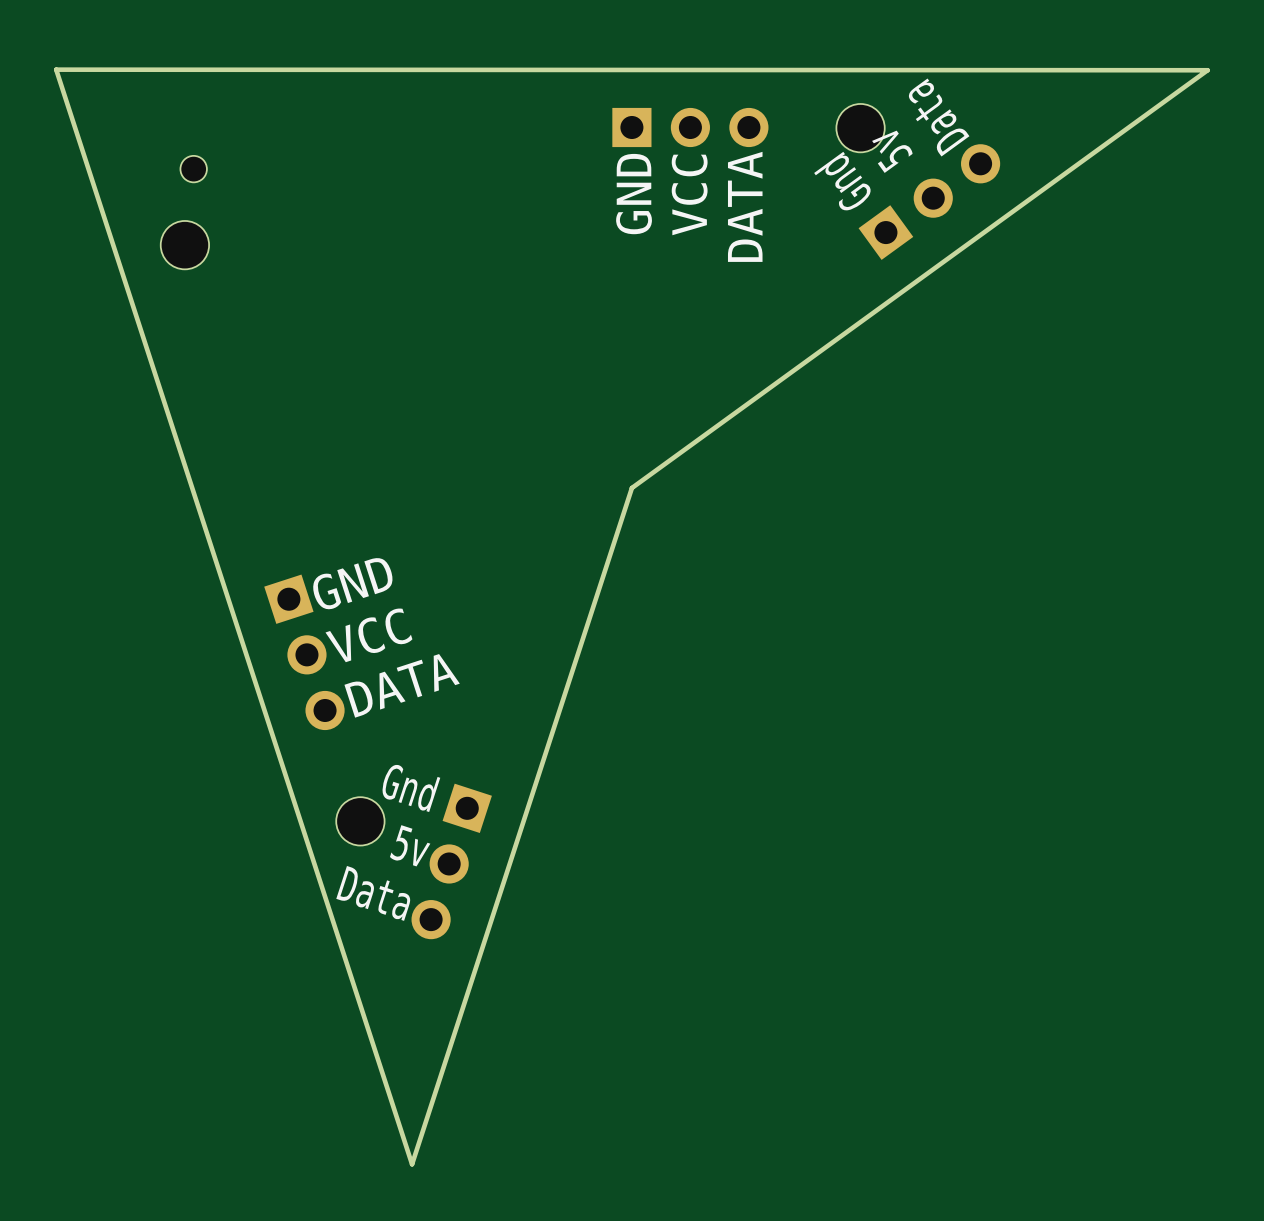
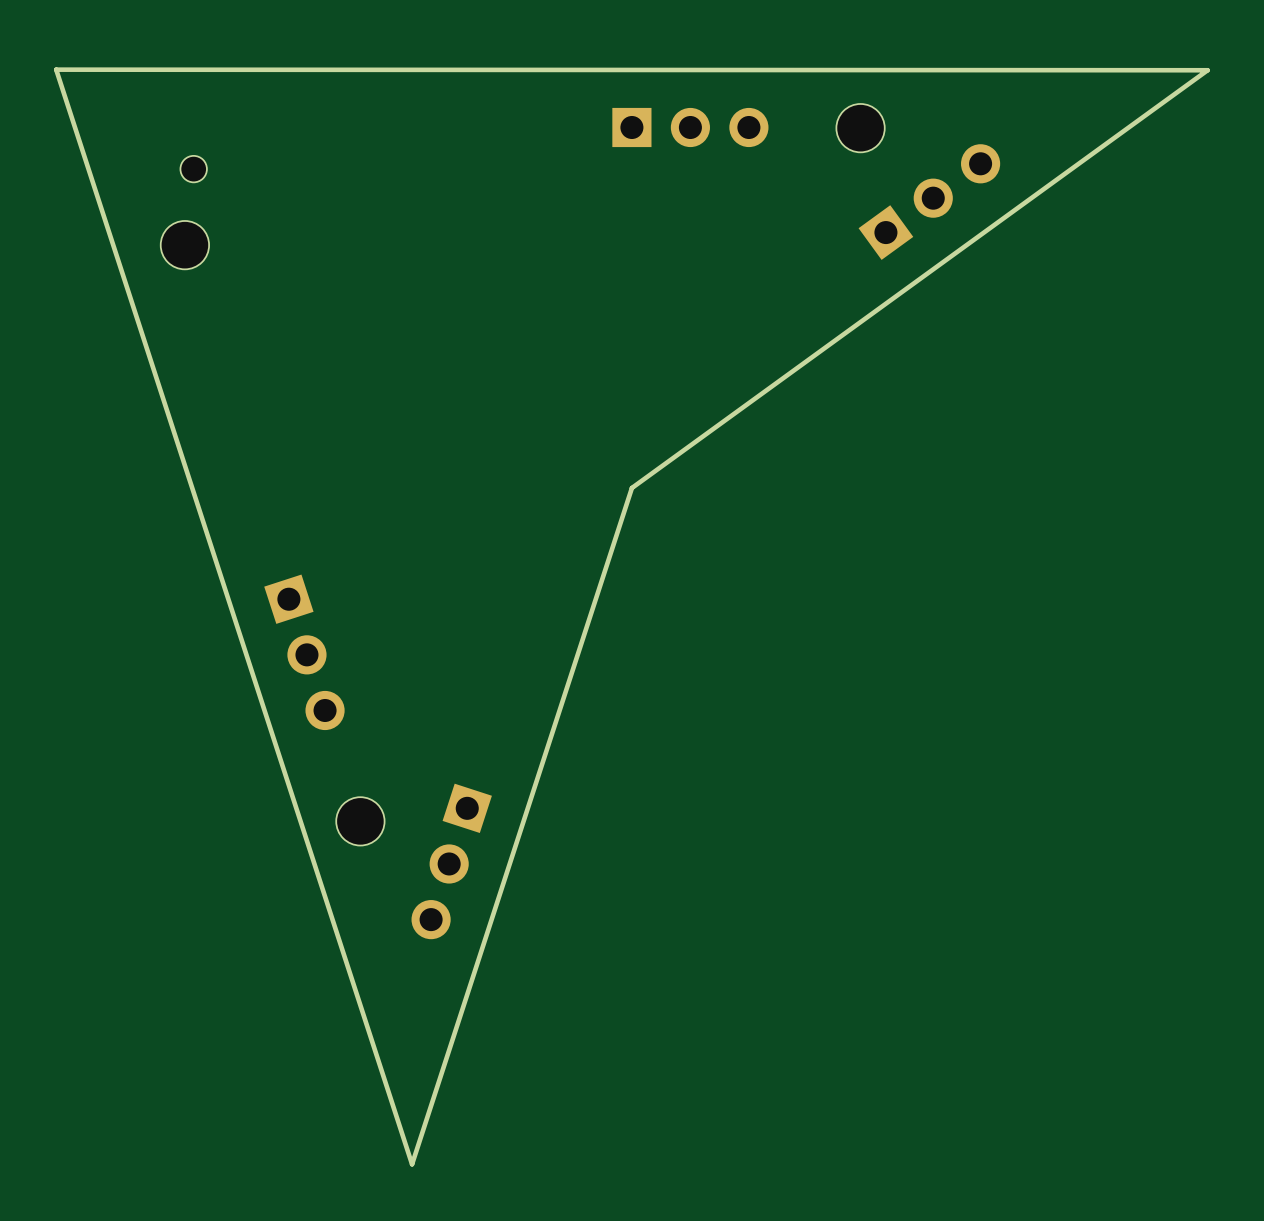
text: Data (939, 117) -> none
text: 5v (892, 151) -> none
text: Gnd (843, 181) -> none
text: GND (634, 194) -> none
text: VCC (689, 194) -> none
text: DATA (745, 206) -> none
text: GND (352, 583) -> none
text: VCC (368, 635) -> none
text: DATA (402, 685) -> none
text: Gnd (411, 787) -> none
text: 5v (410, 845) -> none
text: Data (373, 893) -> none

